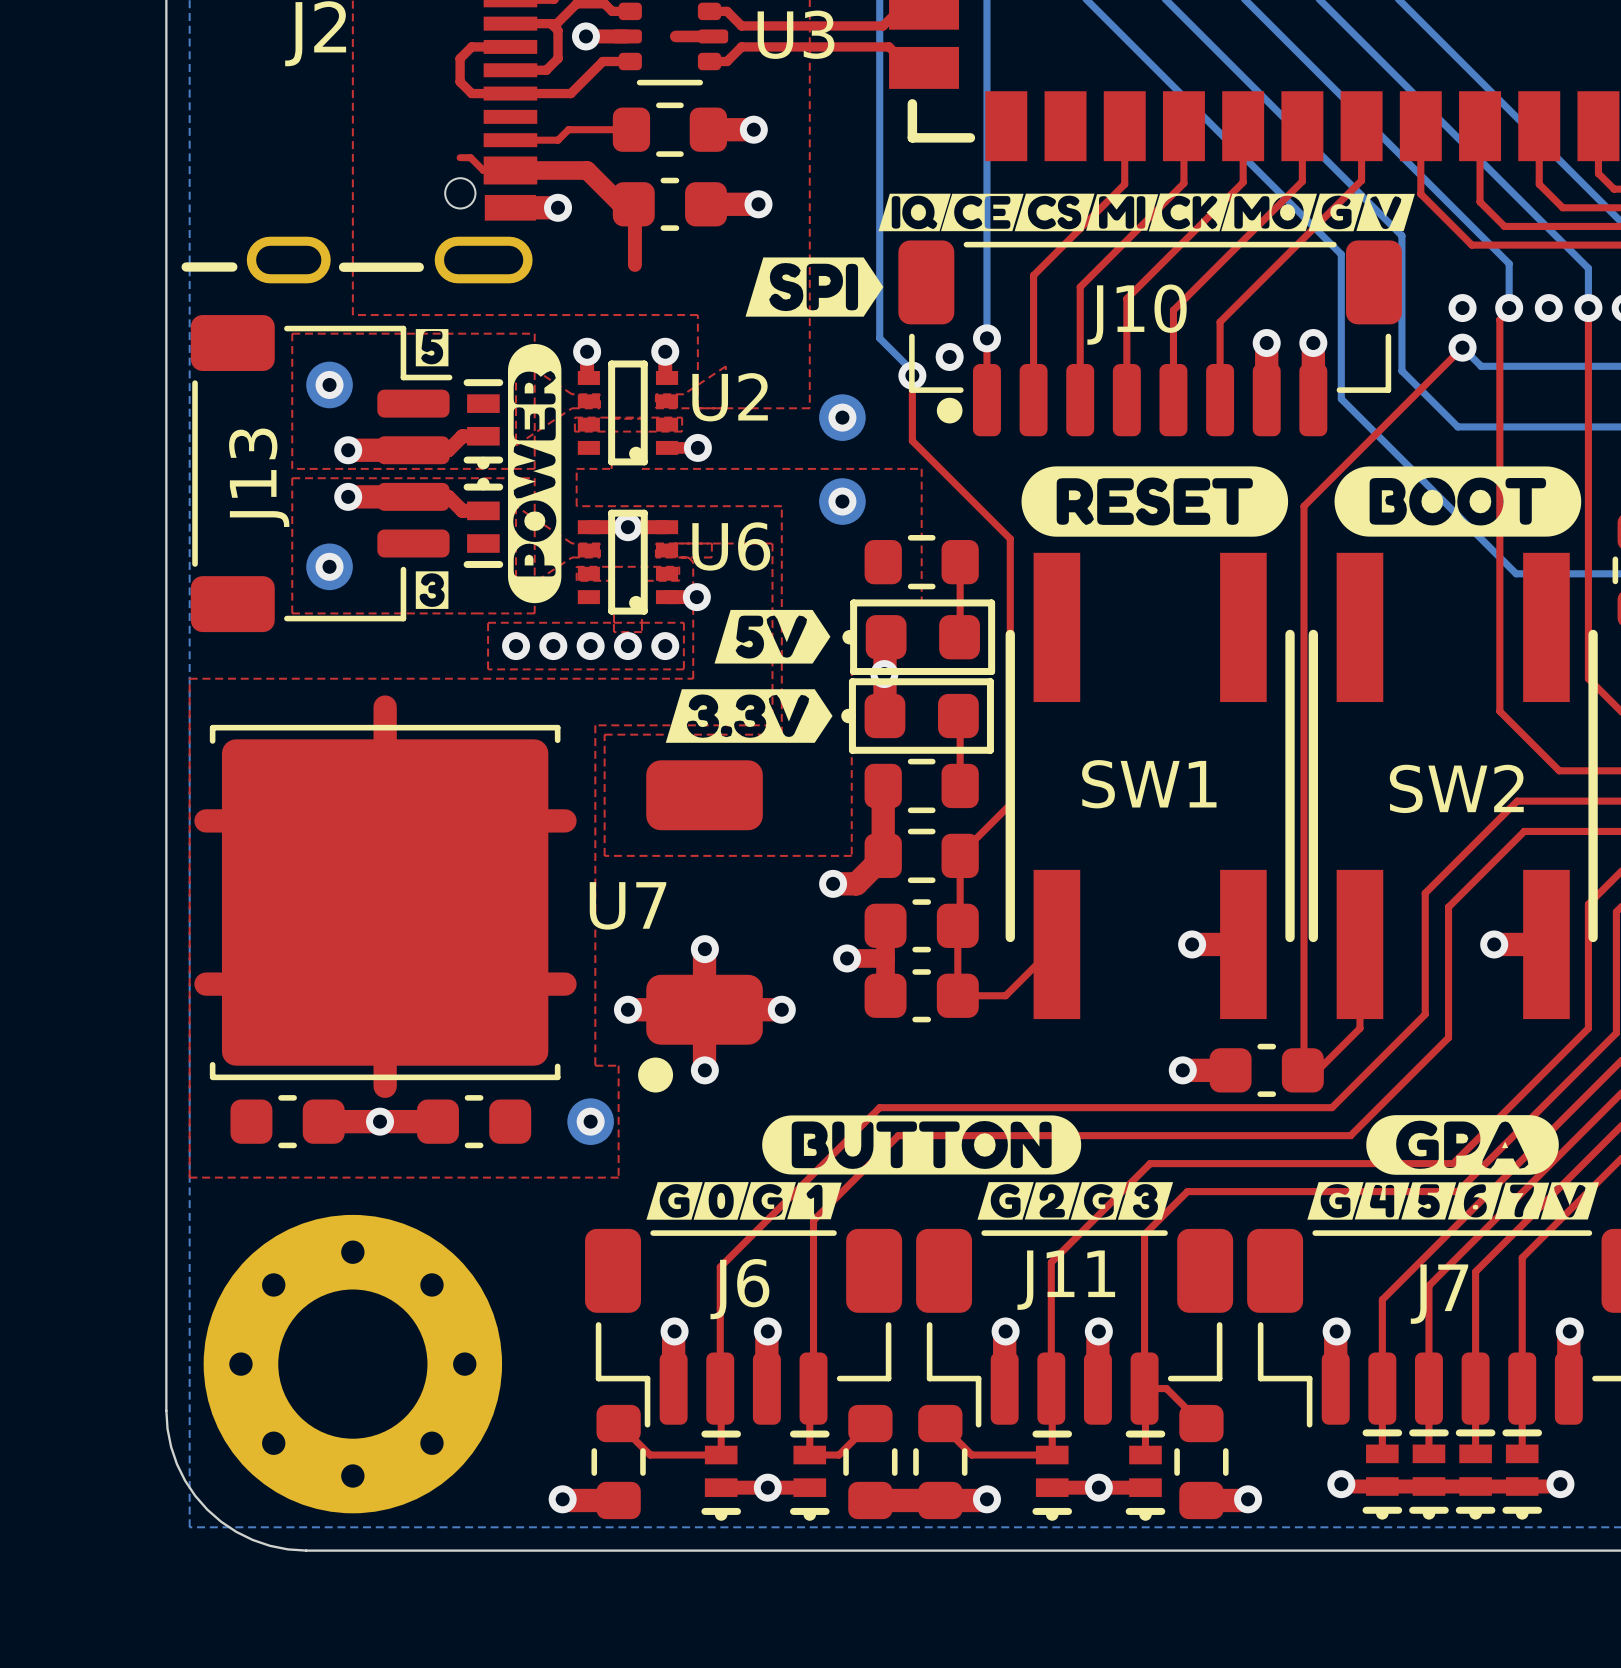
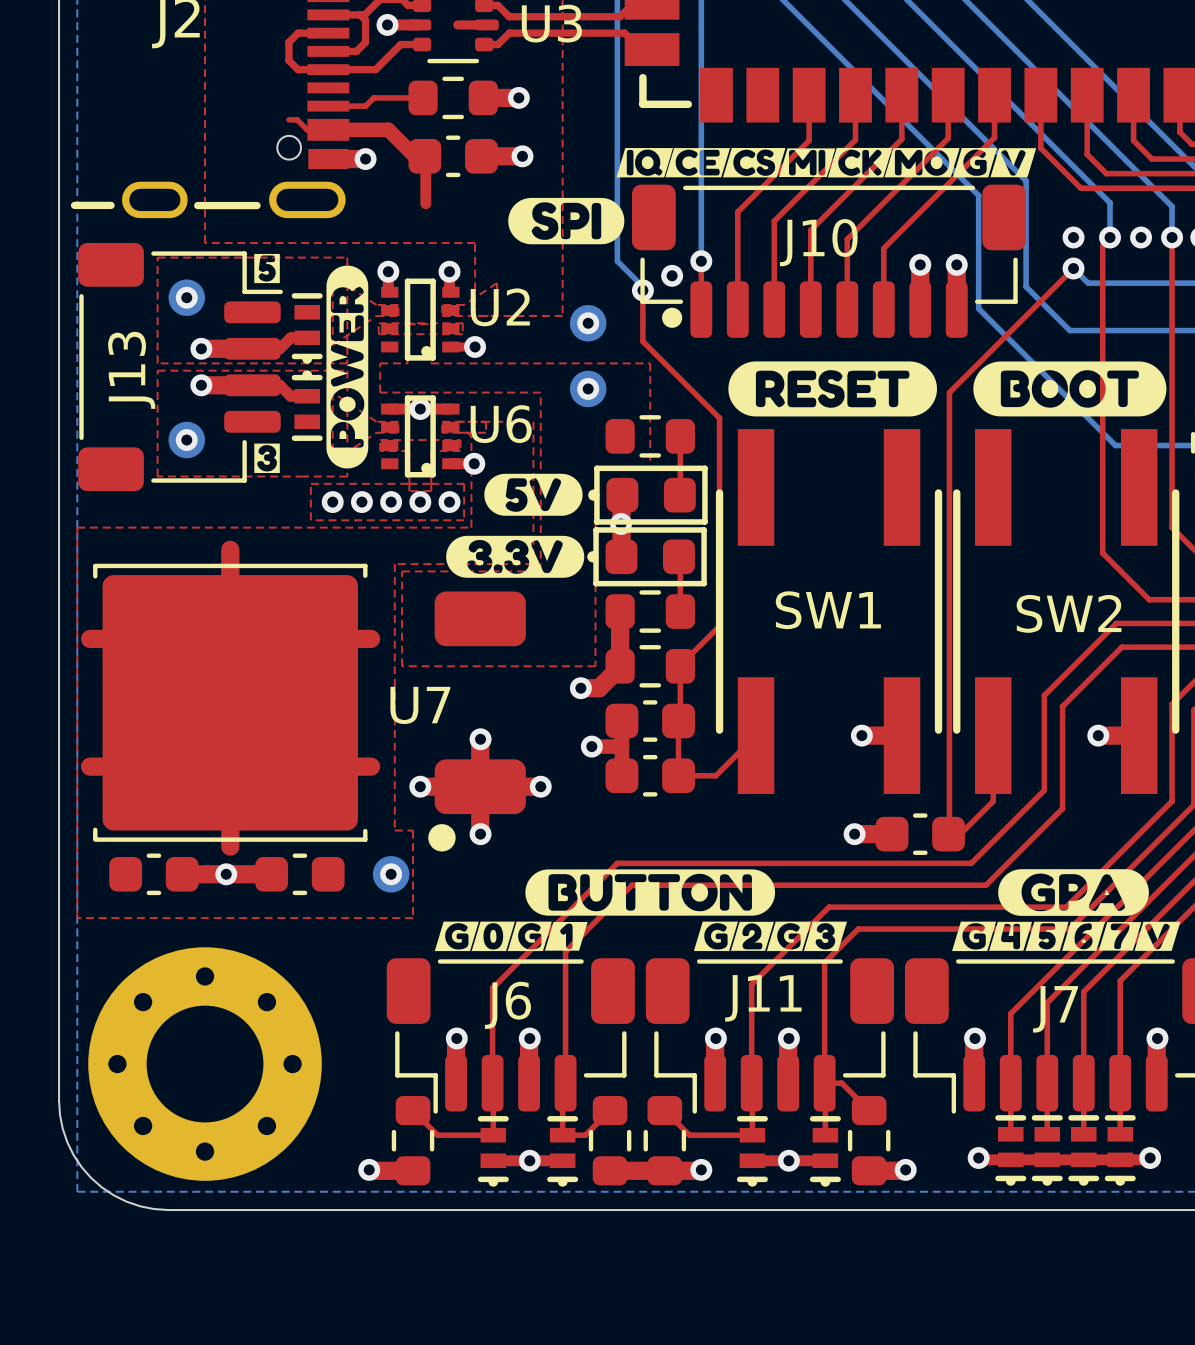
drawing shape: [745, 257, 884, 317] -> [508, 197, 625, 245]
drawing shape: [714, 609, 831, 664] -> [484, 473, 583, 516]
drawing shape: [665, 689, 833, 743] -> [446, 535, 585, 578]

